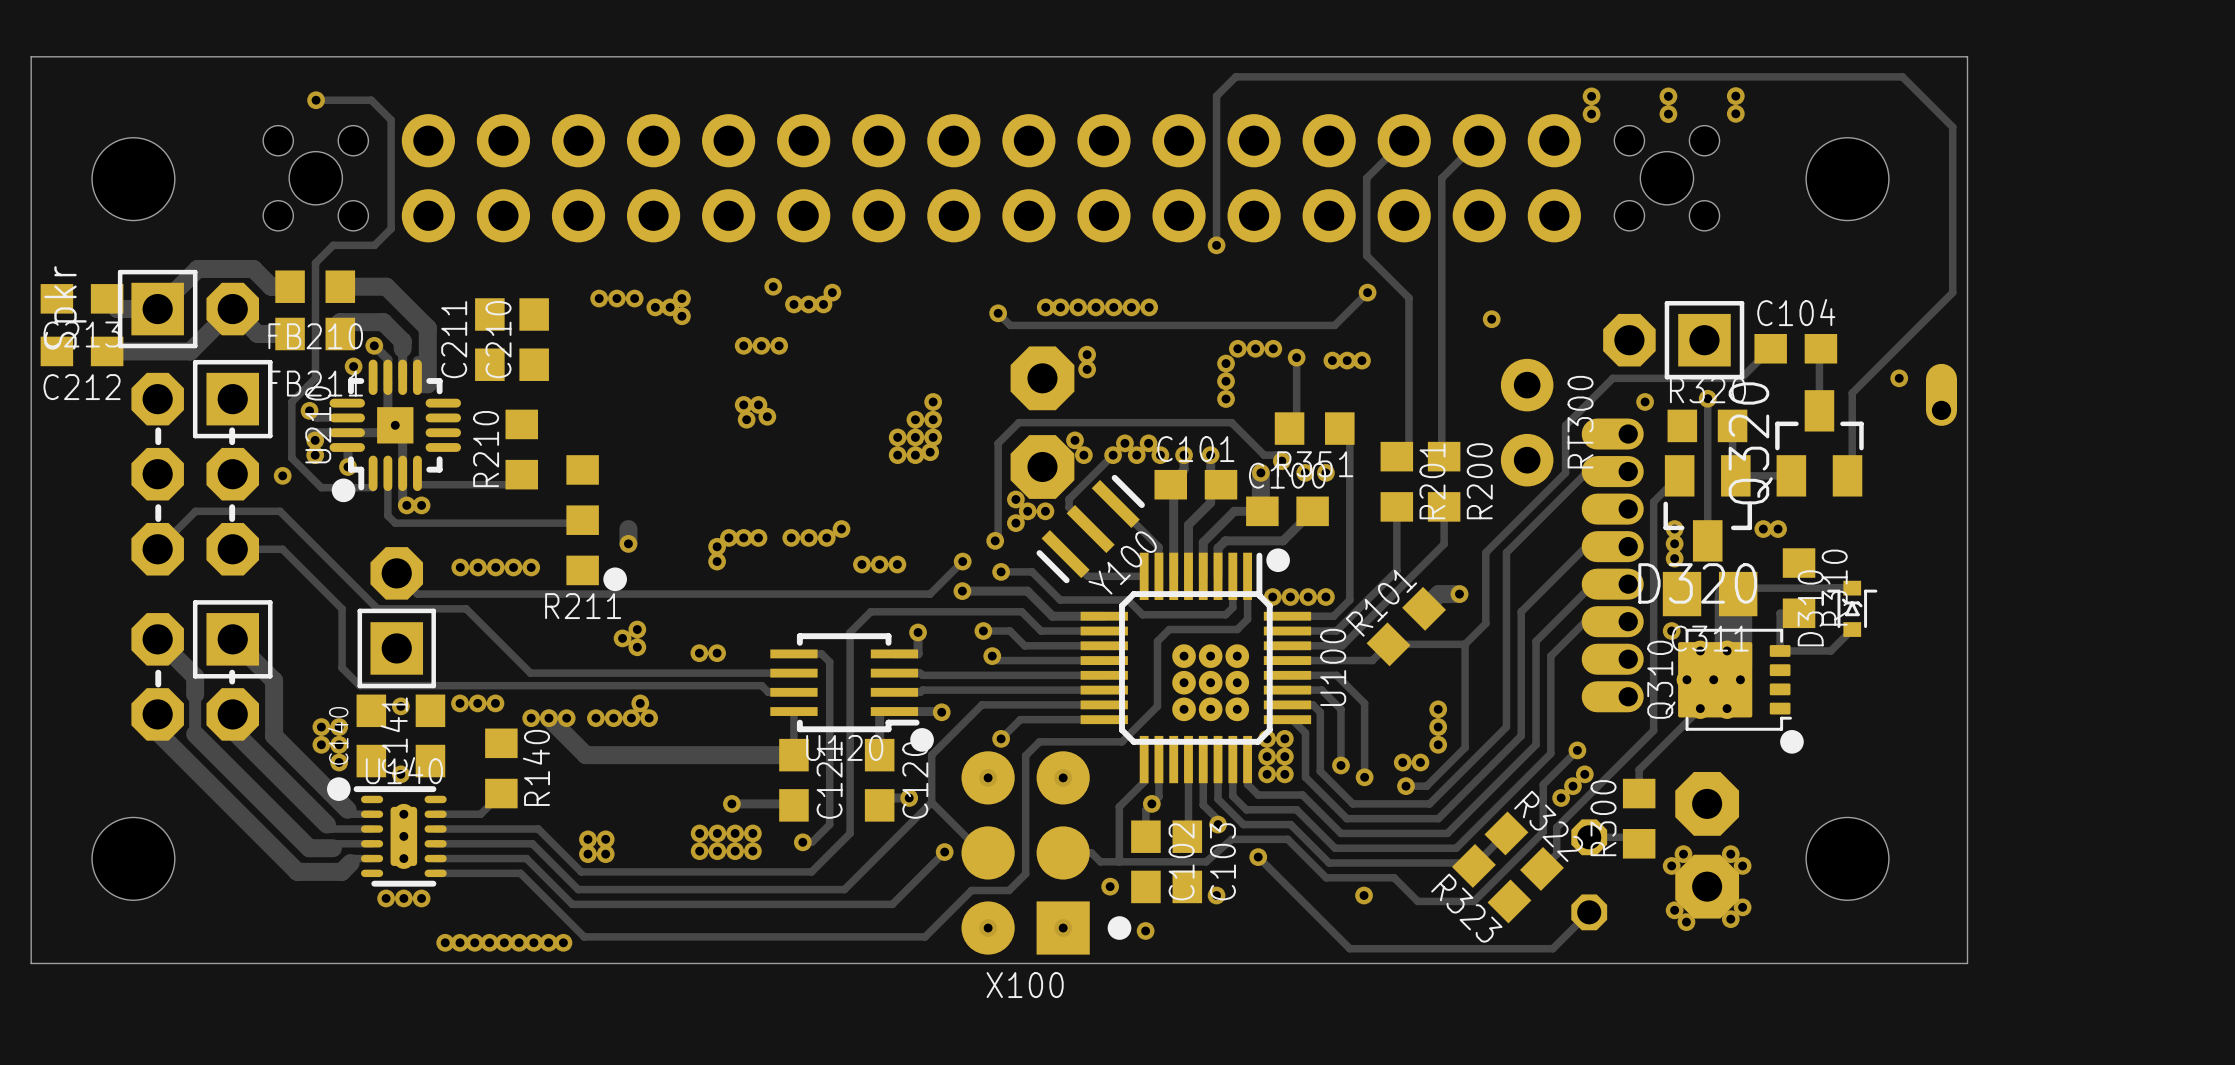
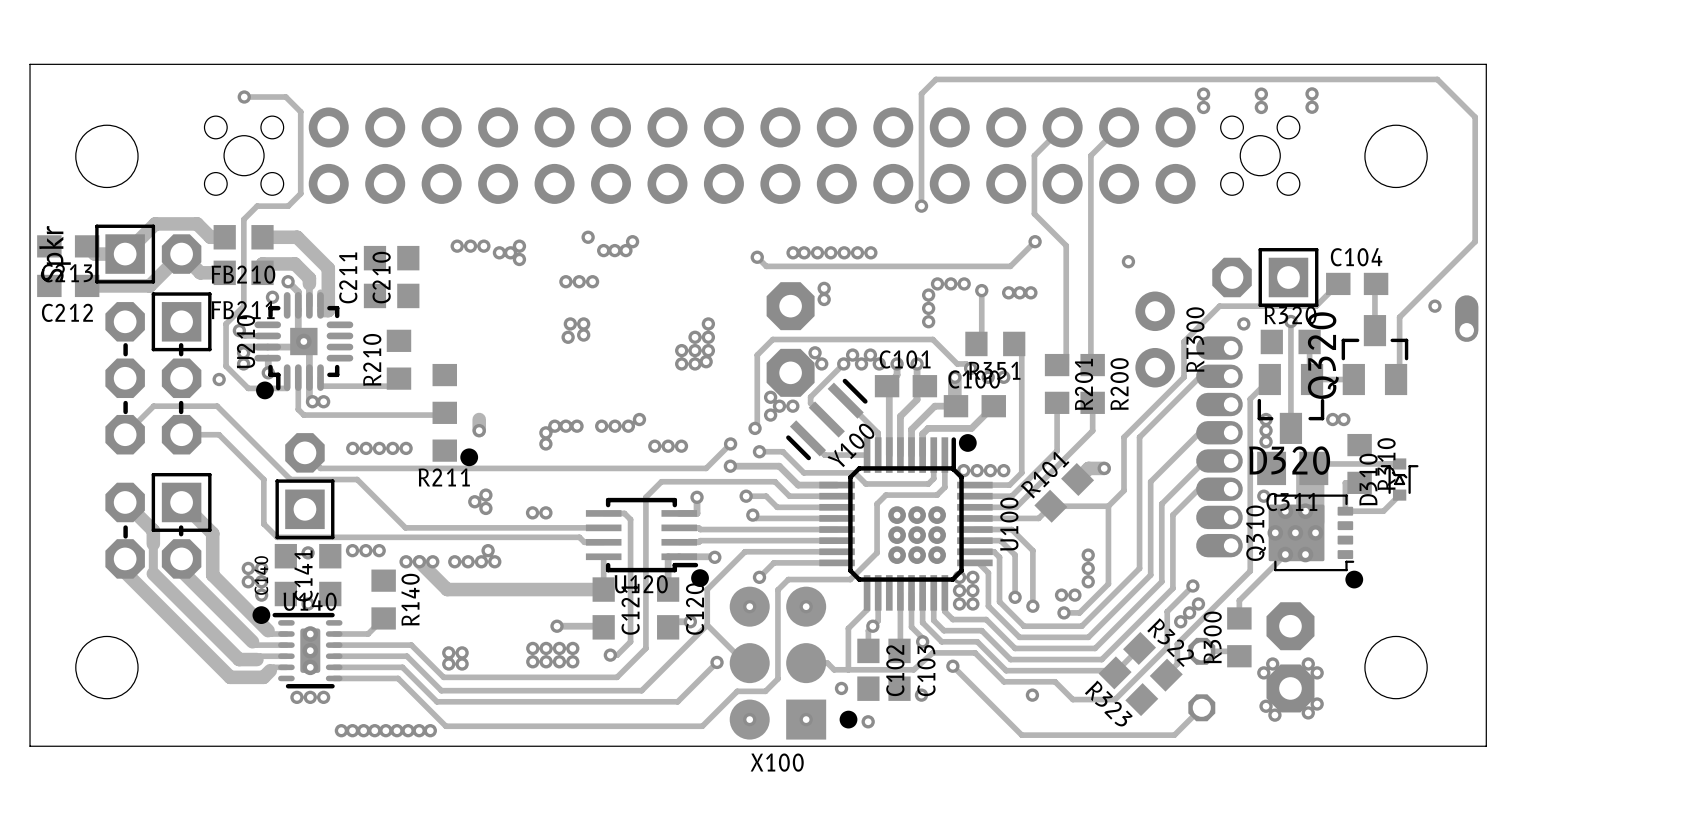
via: none -> (570, 323)
via: none -> (583, 323)
via: (743, 404) -> none
via: (758, 404) -> none

